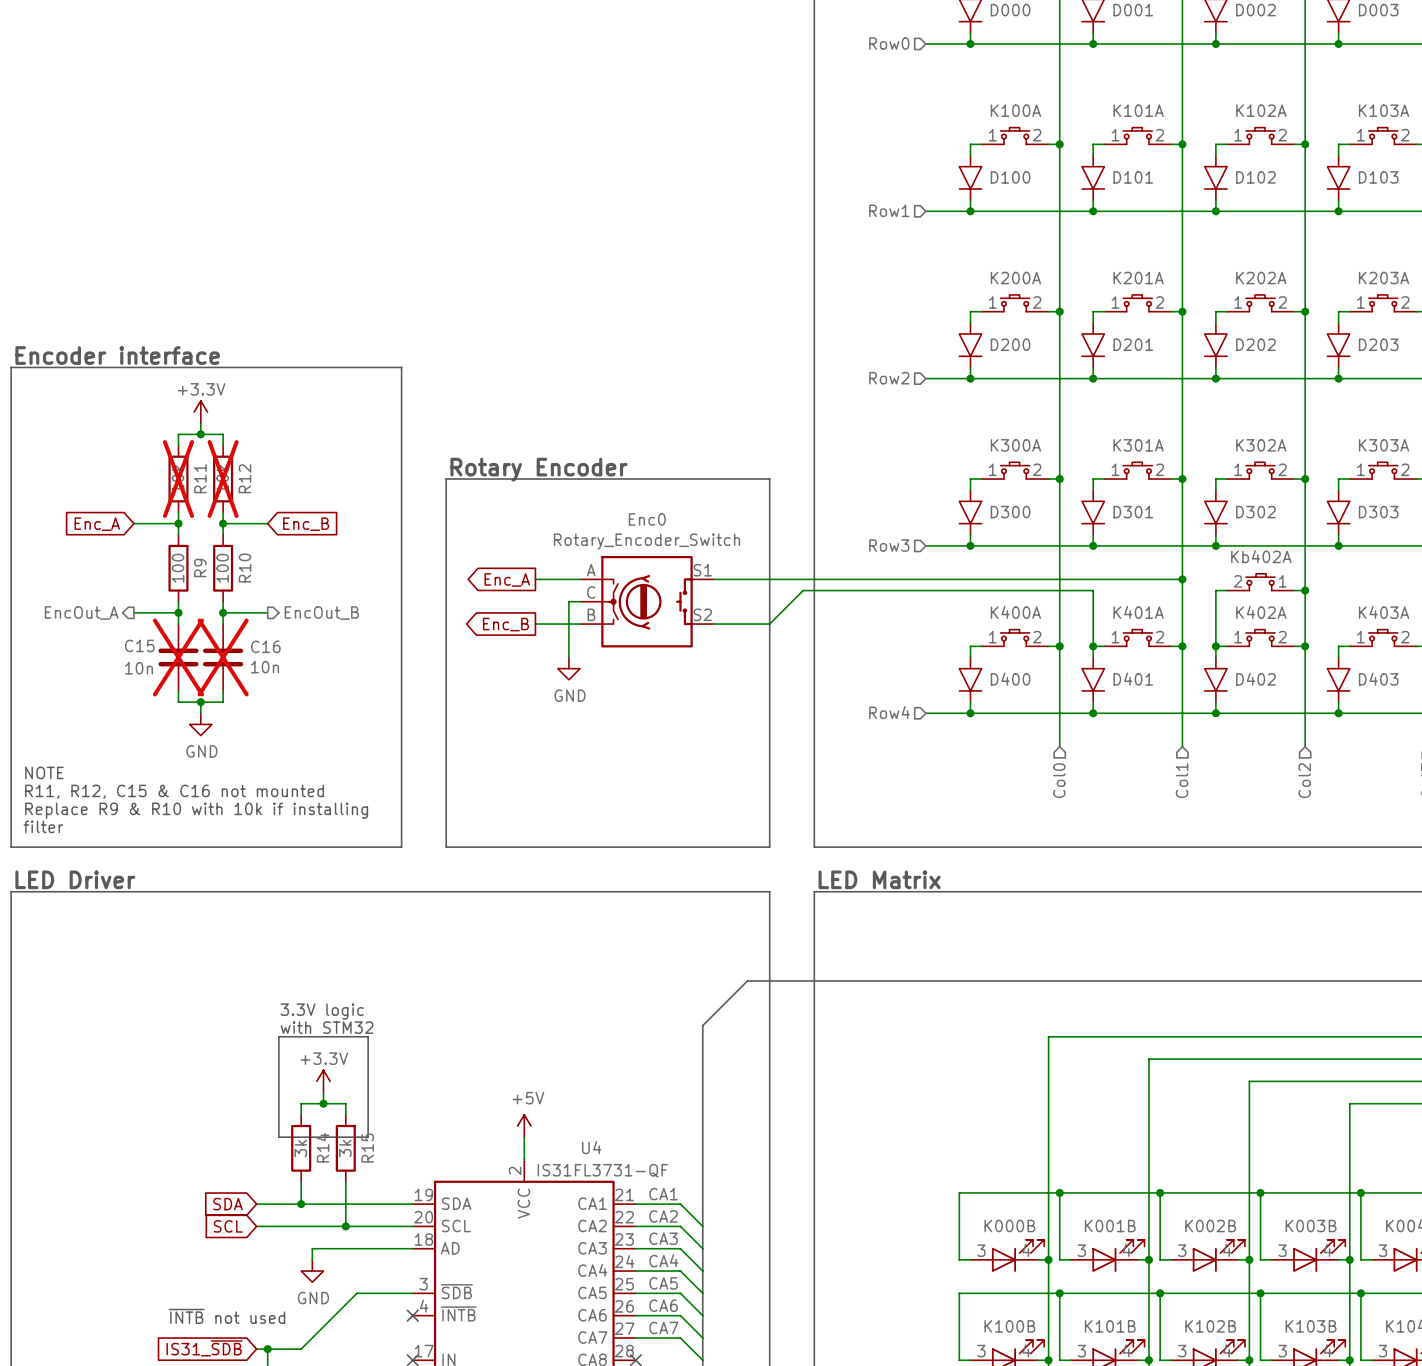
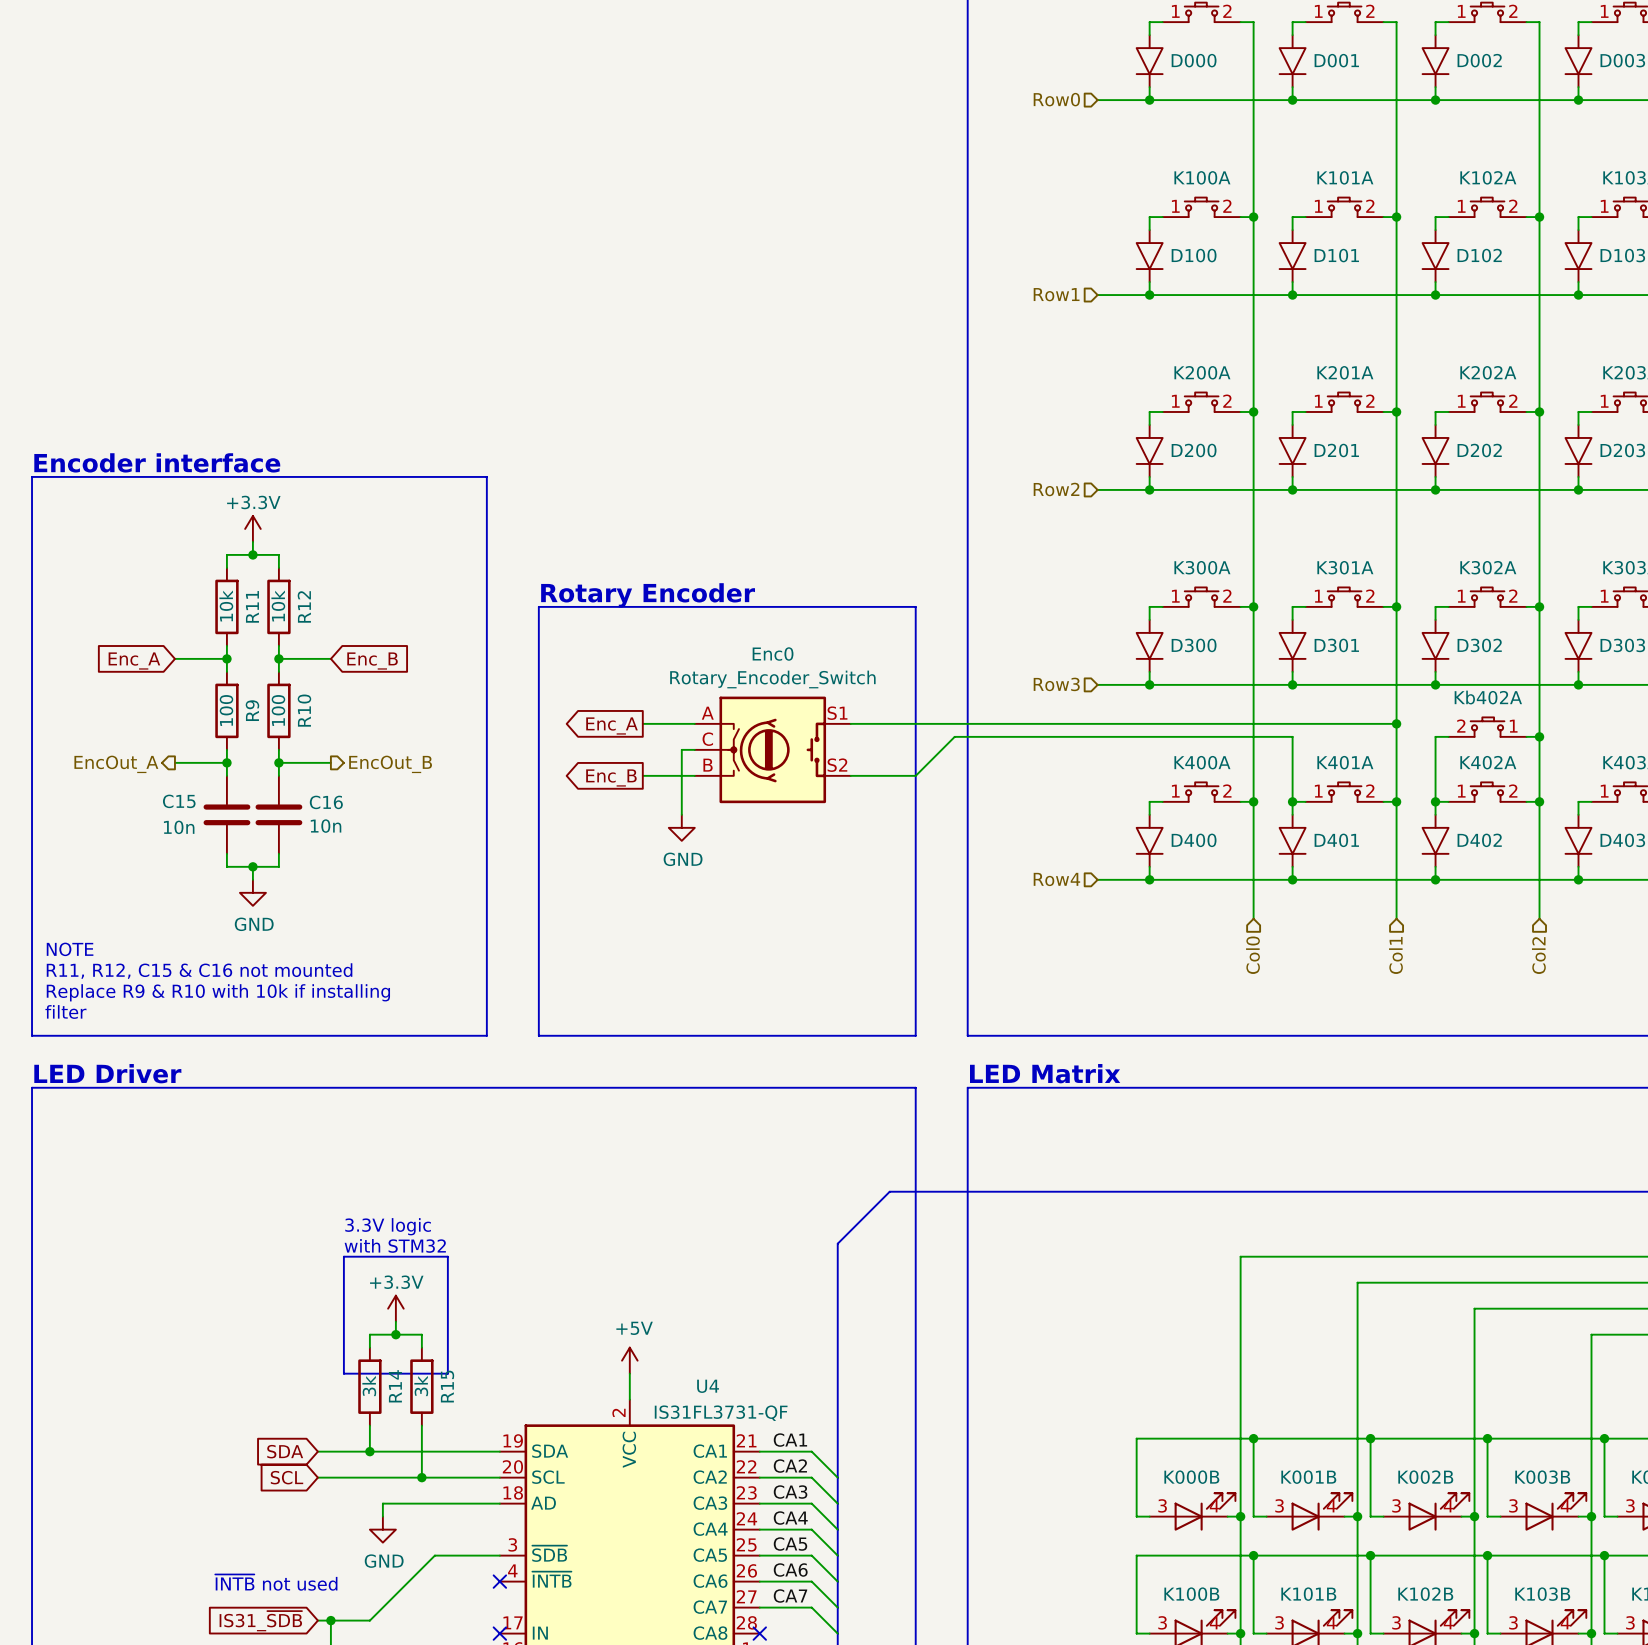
R11 do-not-place cross: (178, 479) -> none
R12 do-not-place cross: (223, 479) -> none
C15 do-not-place cross: (178, 657) -> none
C16 do-not-place cross: (223, 657) -> none

